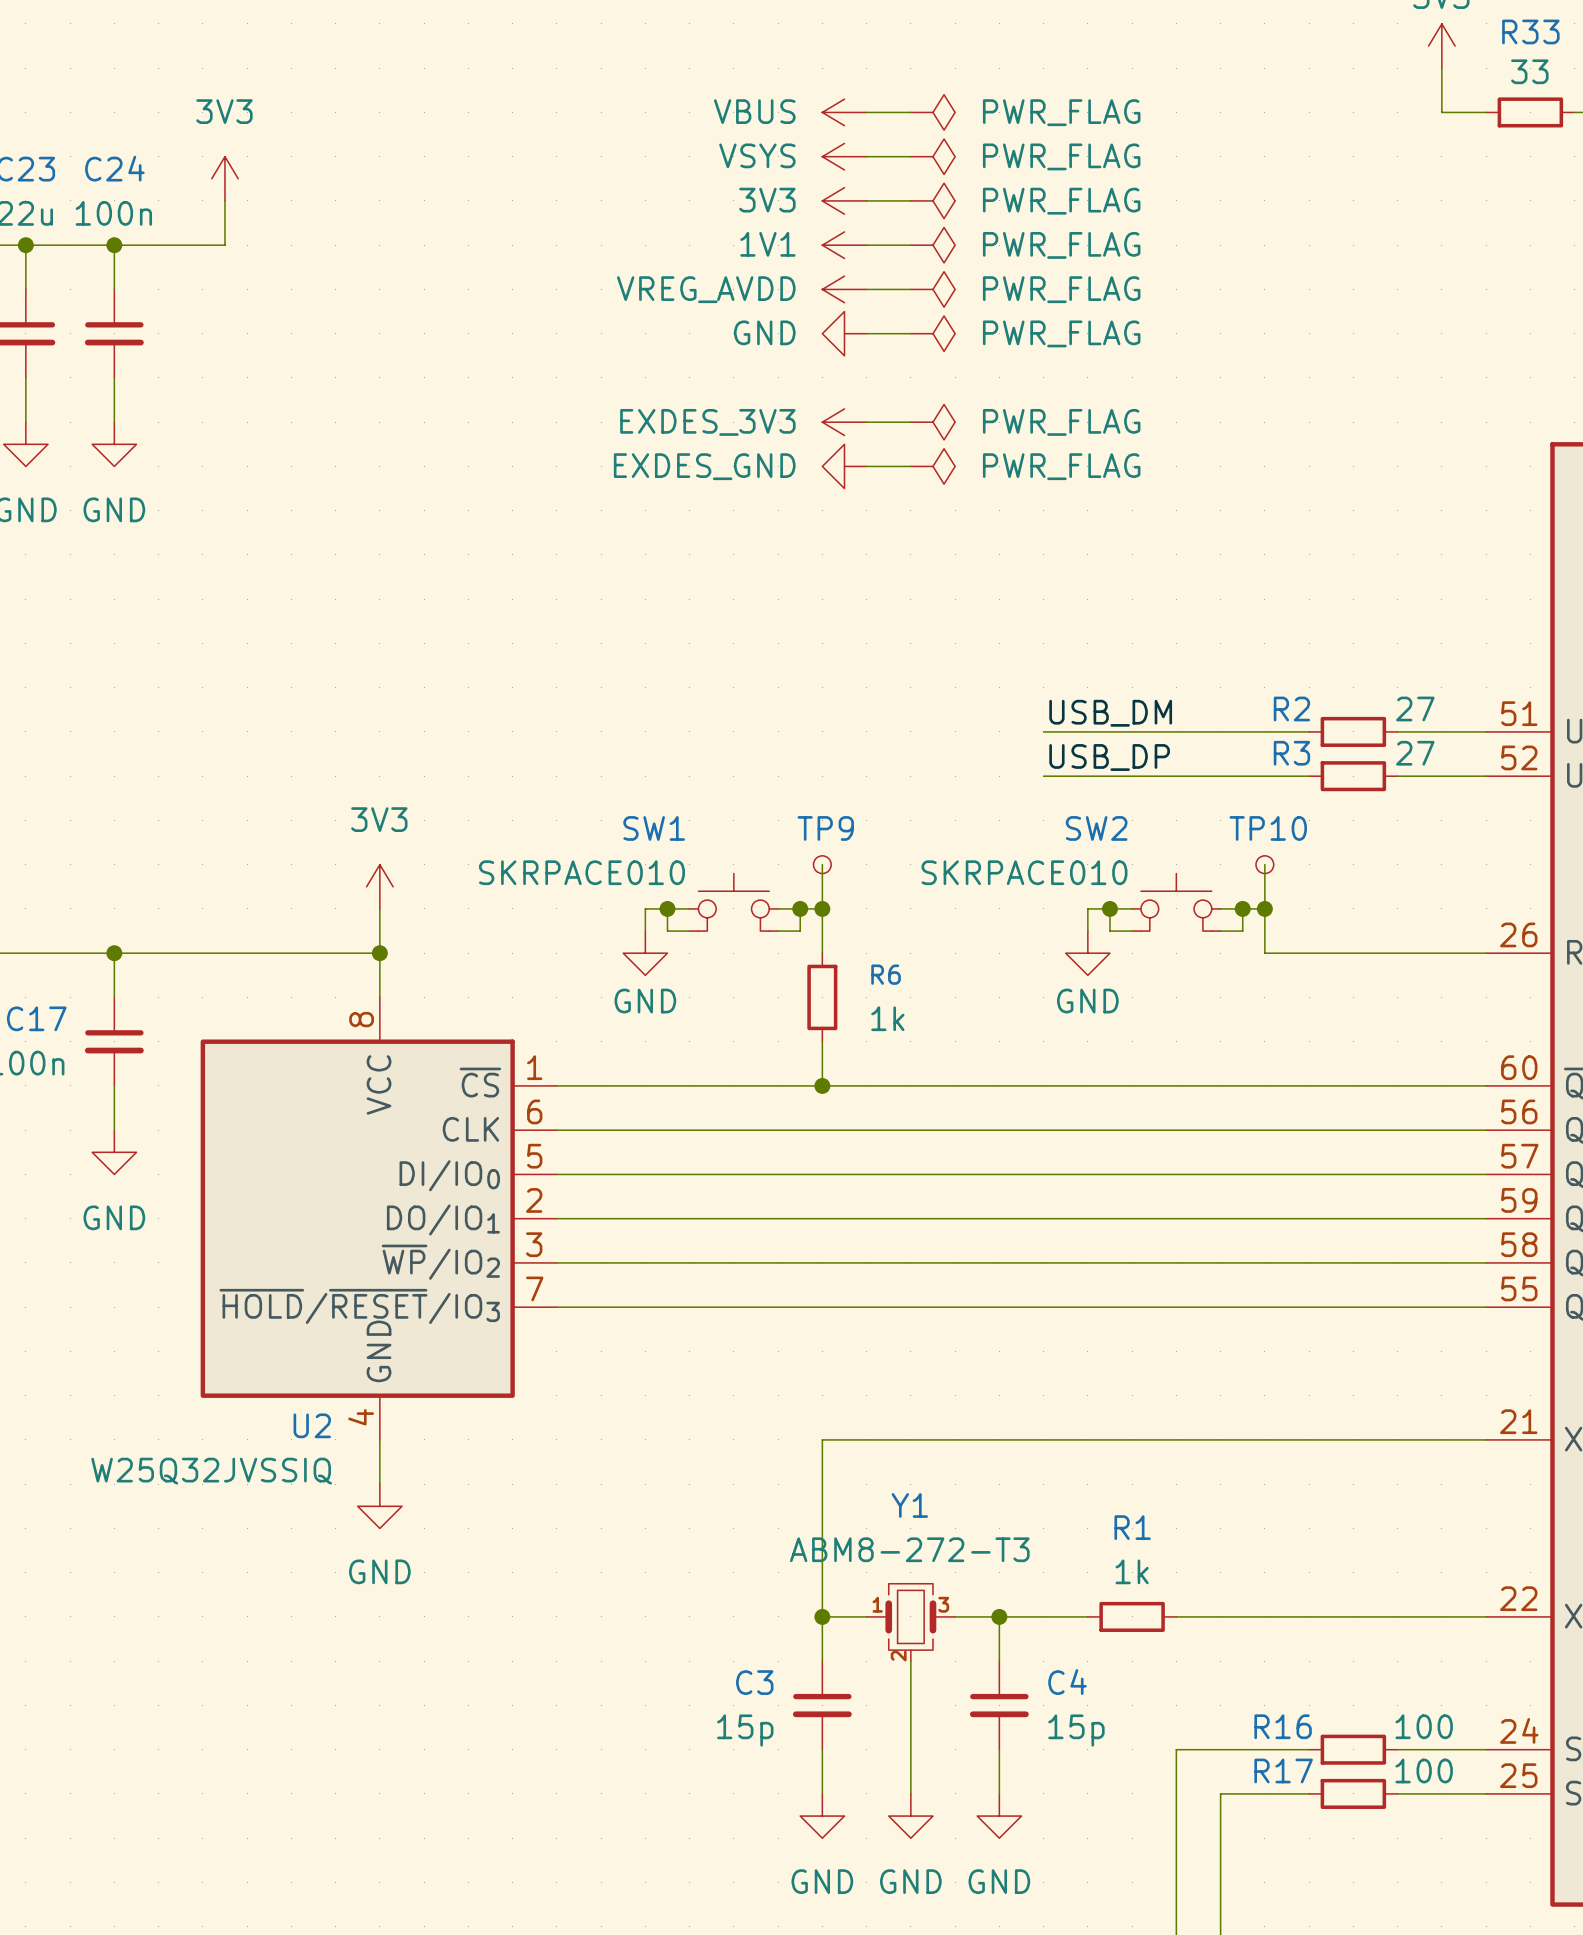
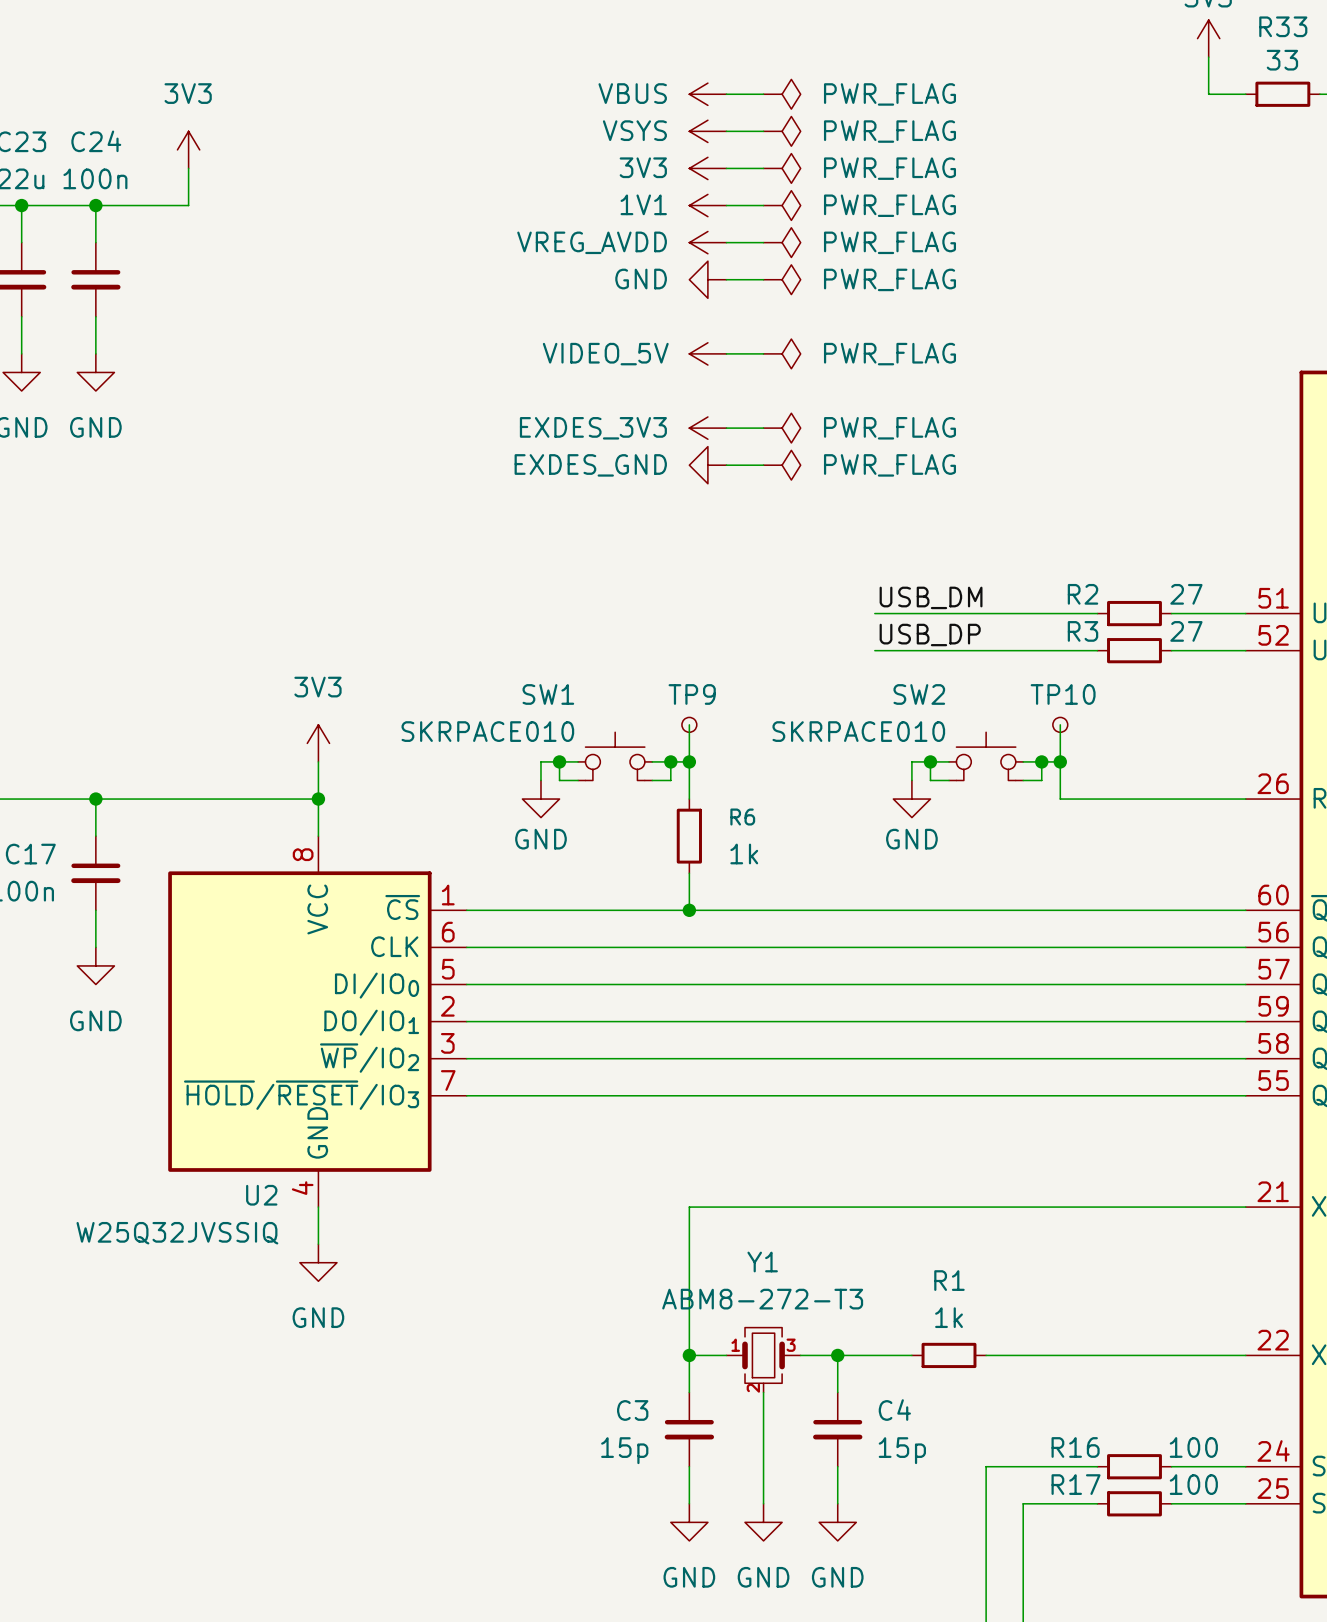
power symbol: EXDES_3V3 (844, 422) -> VIDEO_5V (707, 353)
power symbol position: EXDES_GND (844, 466) -> EXDES_GND (707, 465)
wire: (866, 466) (910, 466) -> (726, 428) (763, 428)
power symbol: PWR_FLAG (932, 466) -> none
power symbol: none -> EXDES_3V3 (707, 428)
power symbol: none -> PWR_FLAG (782, 428)
wire: none -> (726, 465) (763, 465)
power symbol: none -> PWR_FLAG (782, 465)

